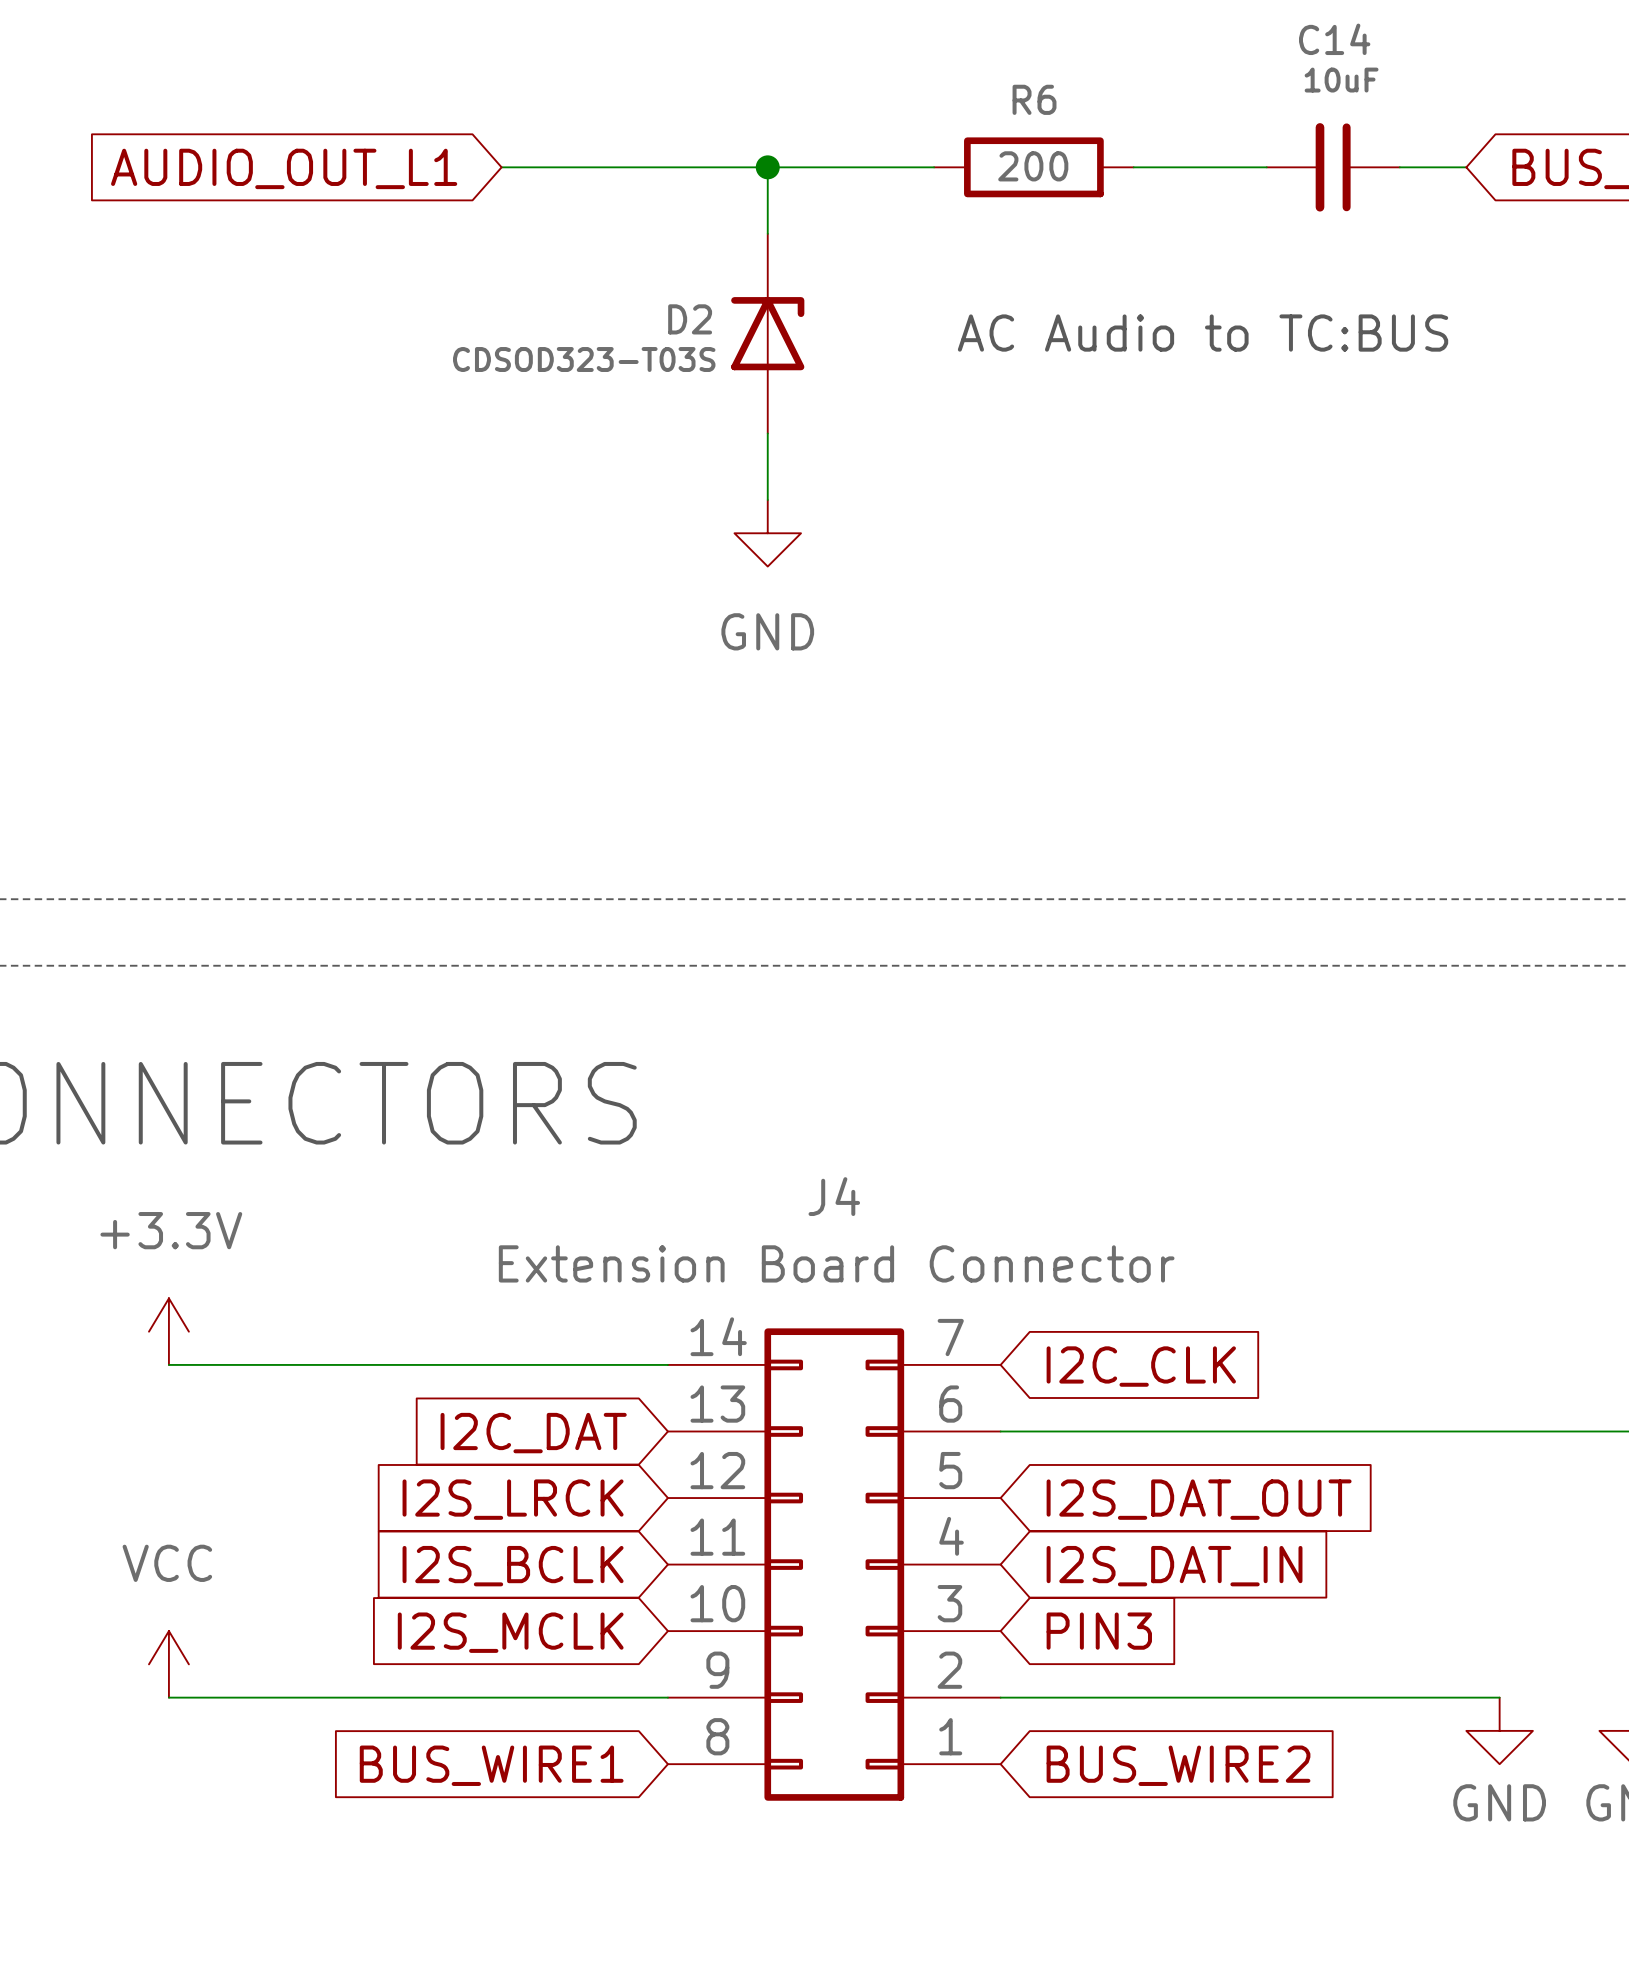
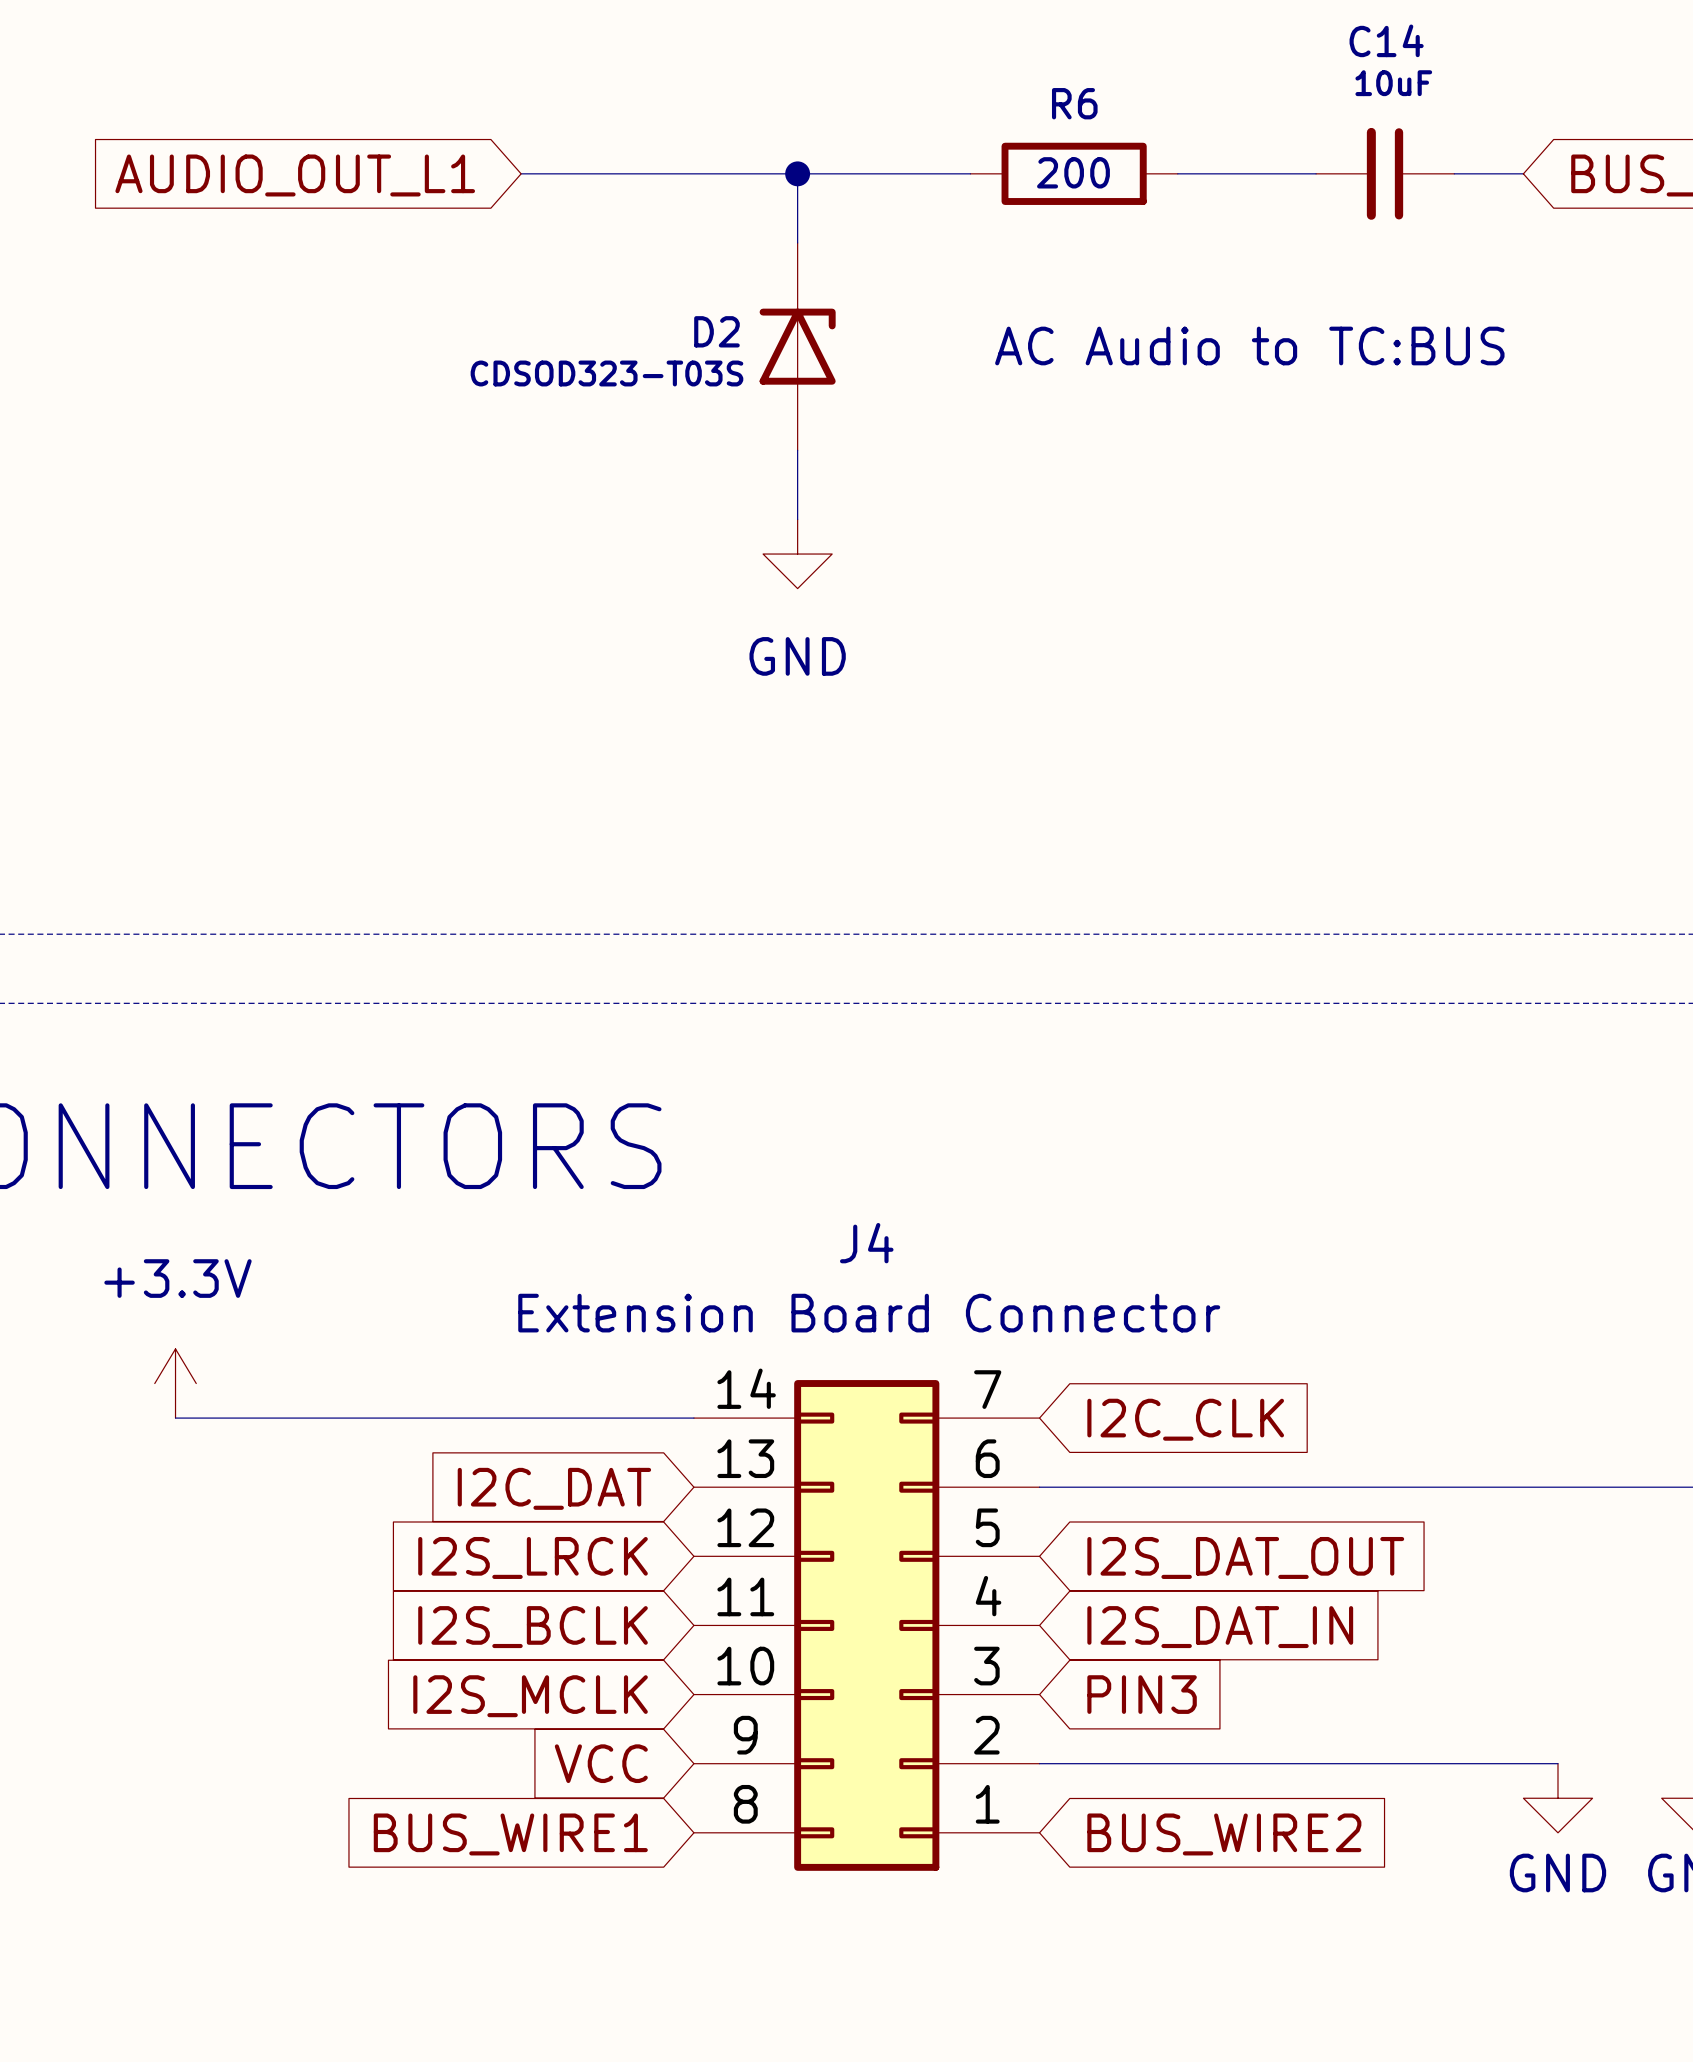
power symbol: VCC (168, 1664) -> none
wire: (168, 1697) (667, 1697) -> none
global label: none -> VCC (601, 1763)

